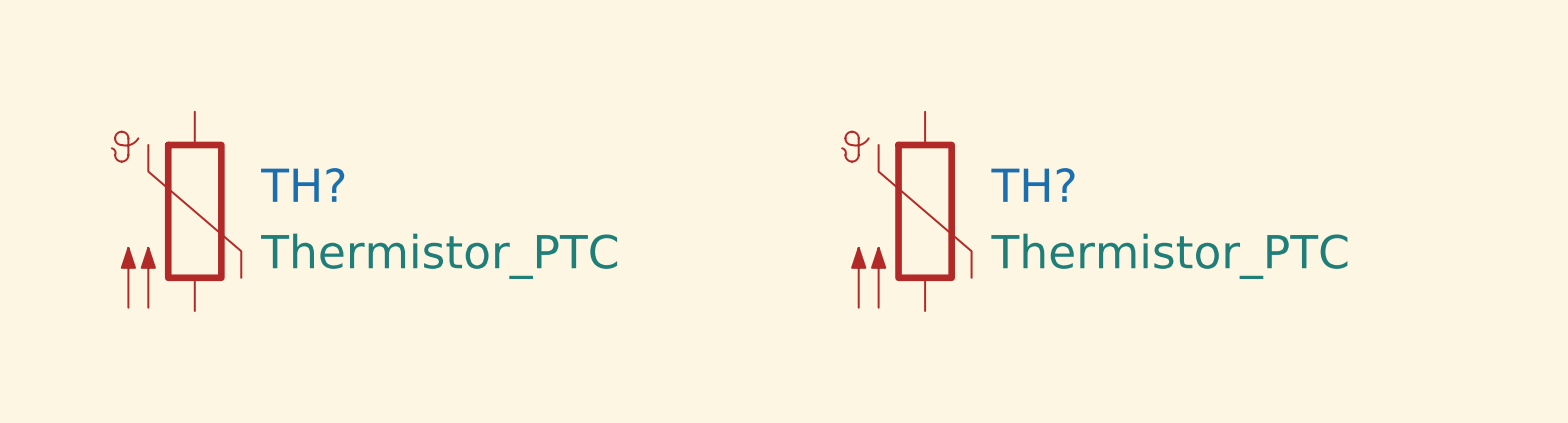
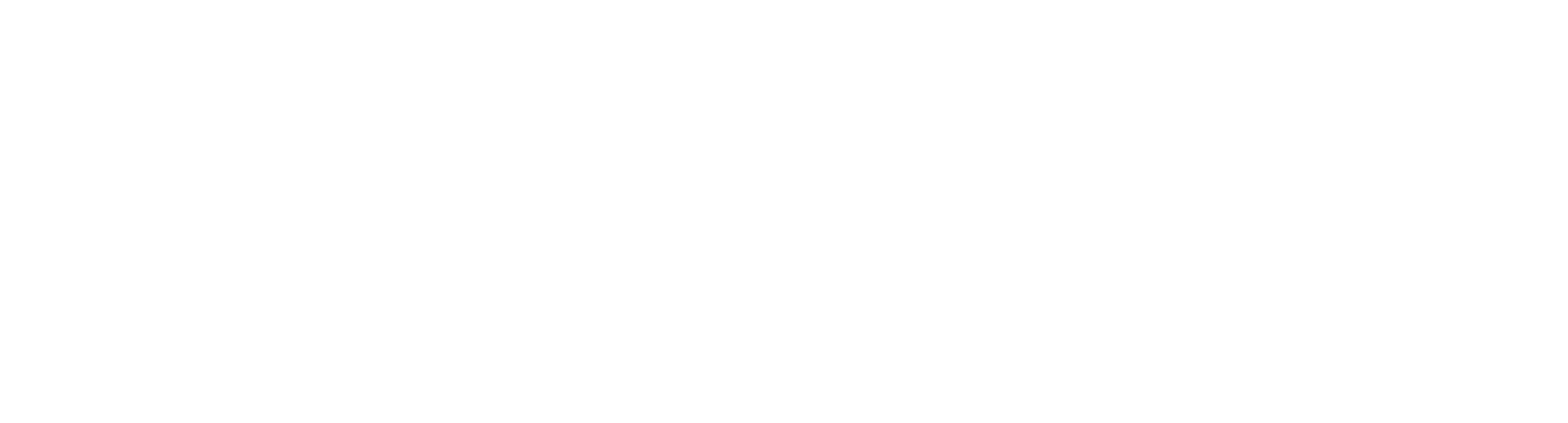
TH?: Thermistor_PTC (176, 211) -> none
TH?: Thermistor_PTC (906, 211) -> none

